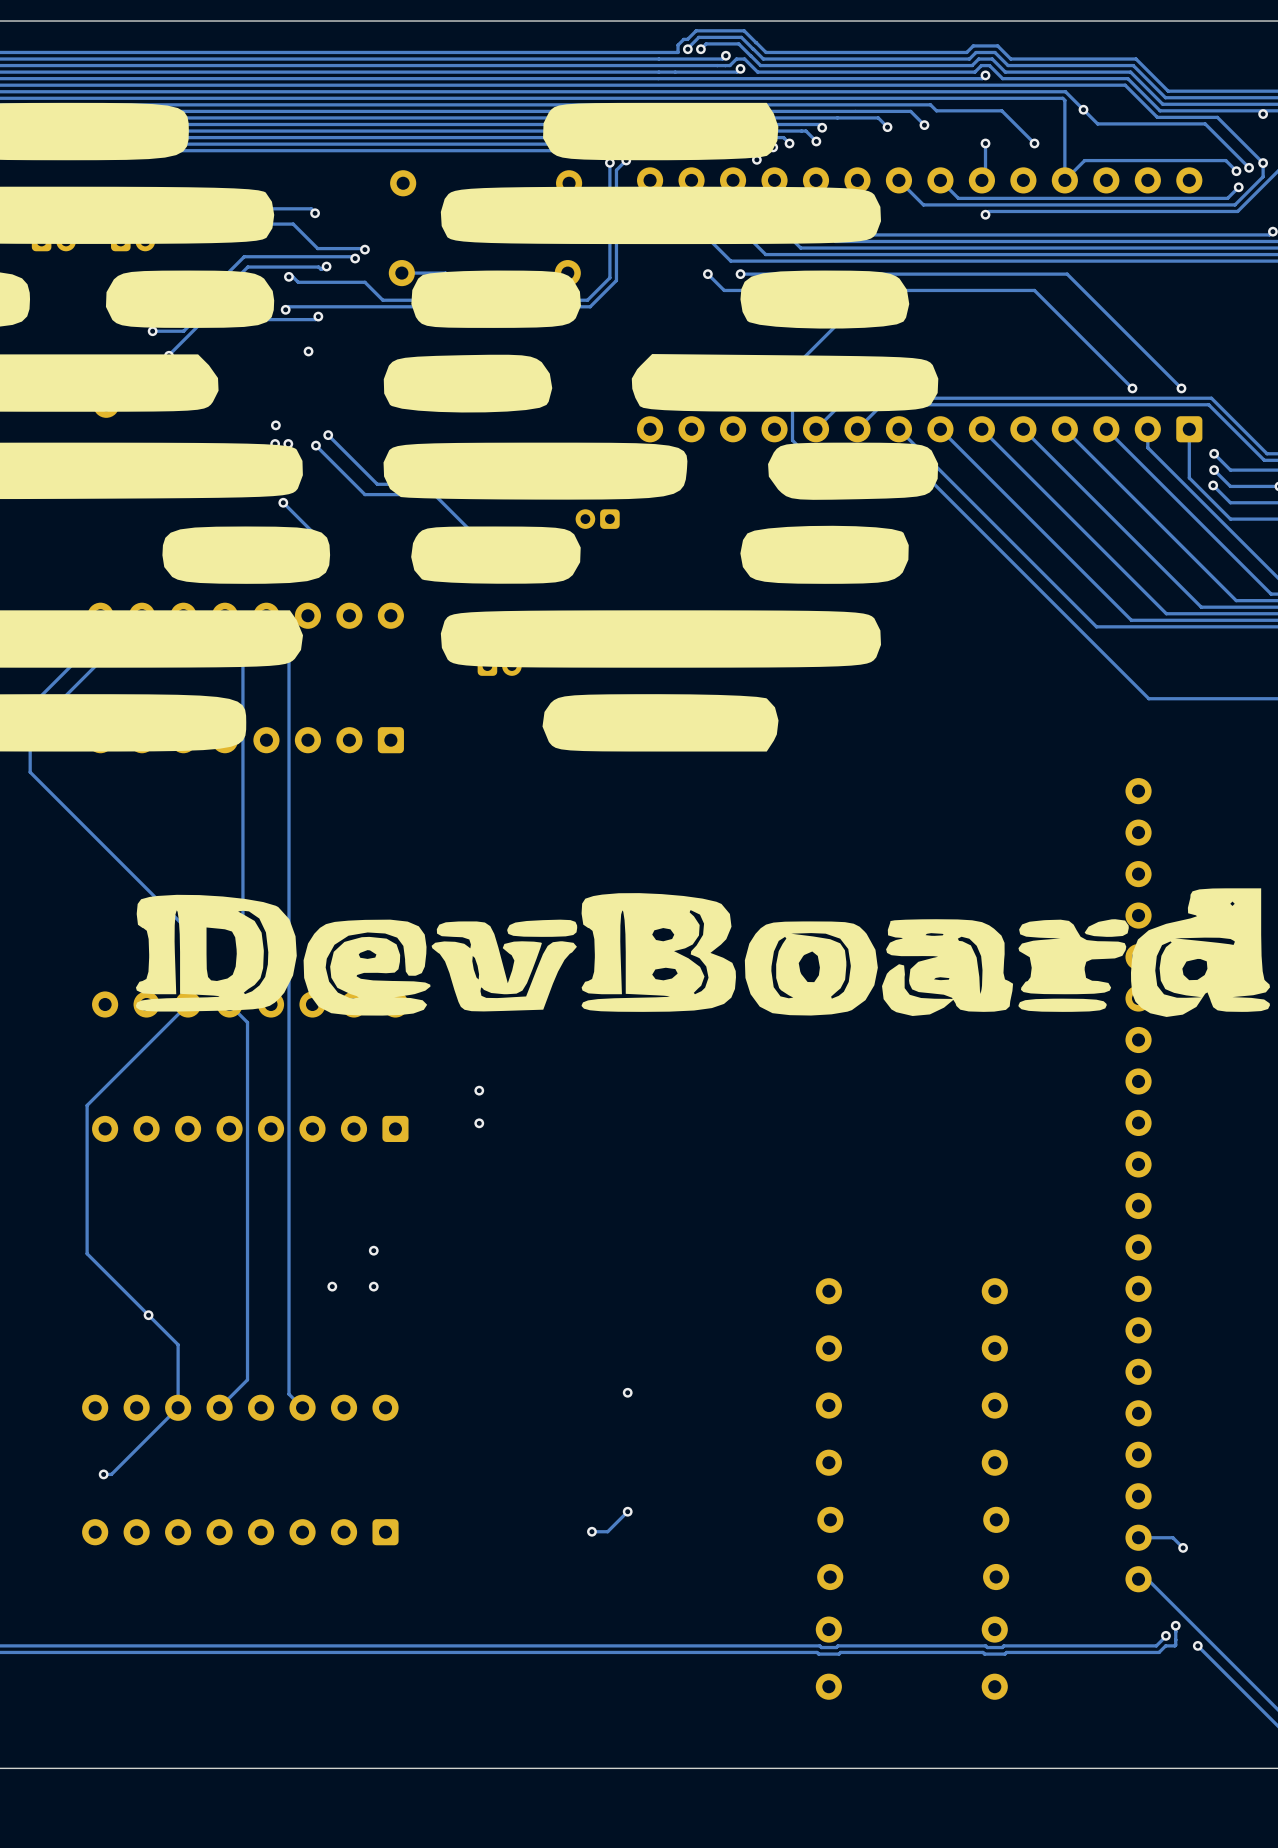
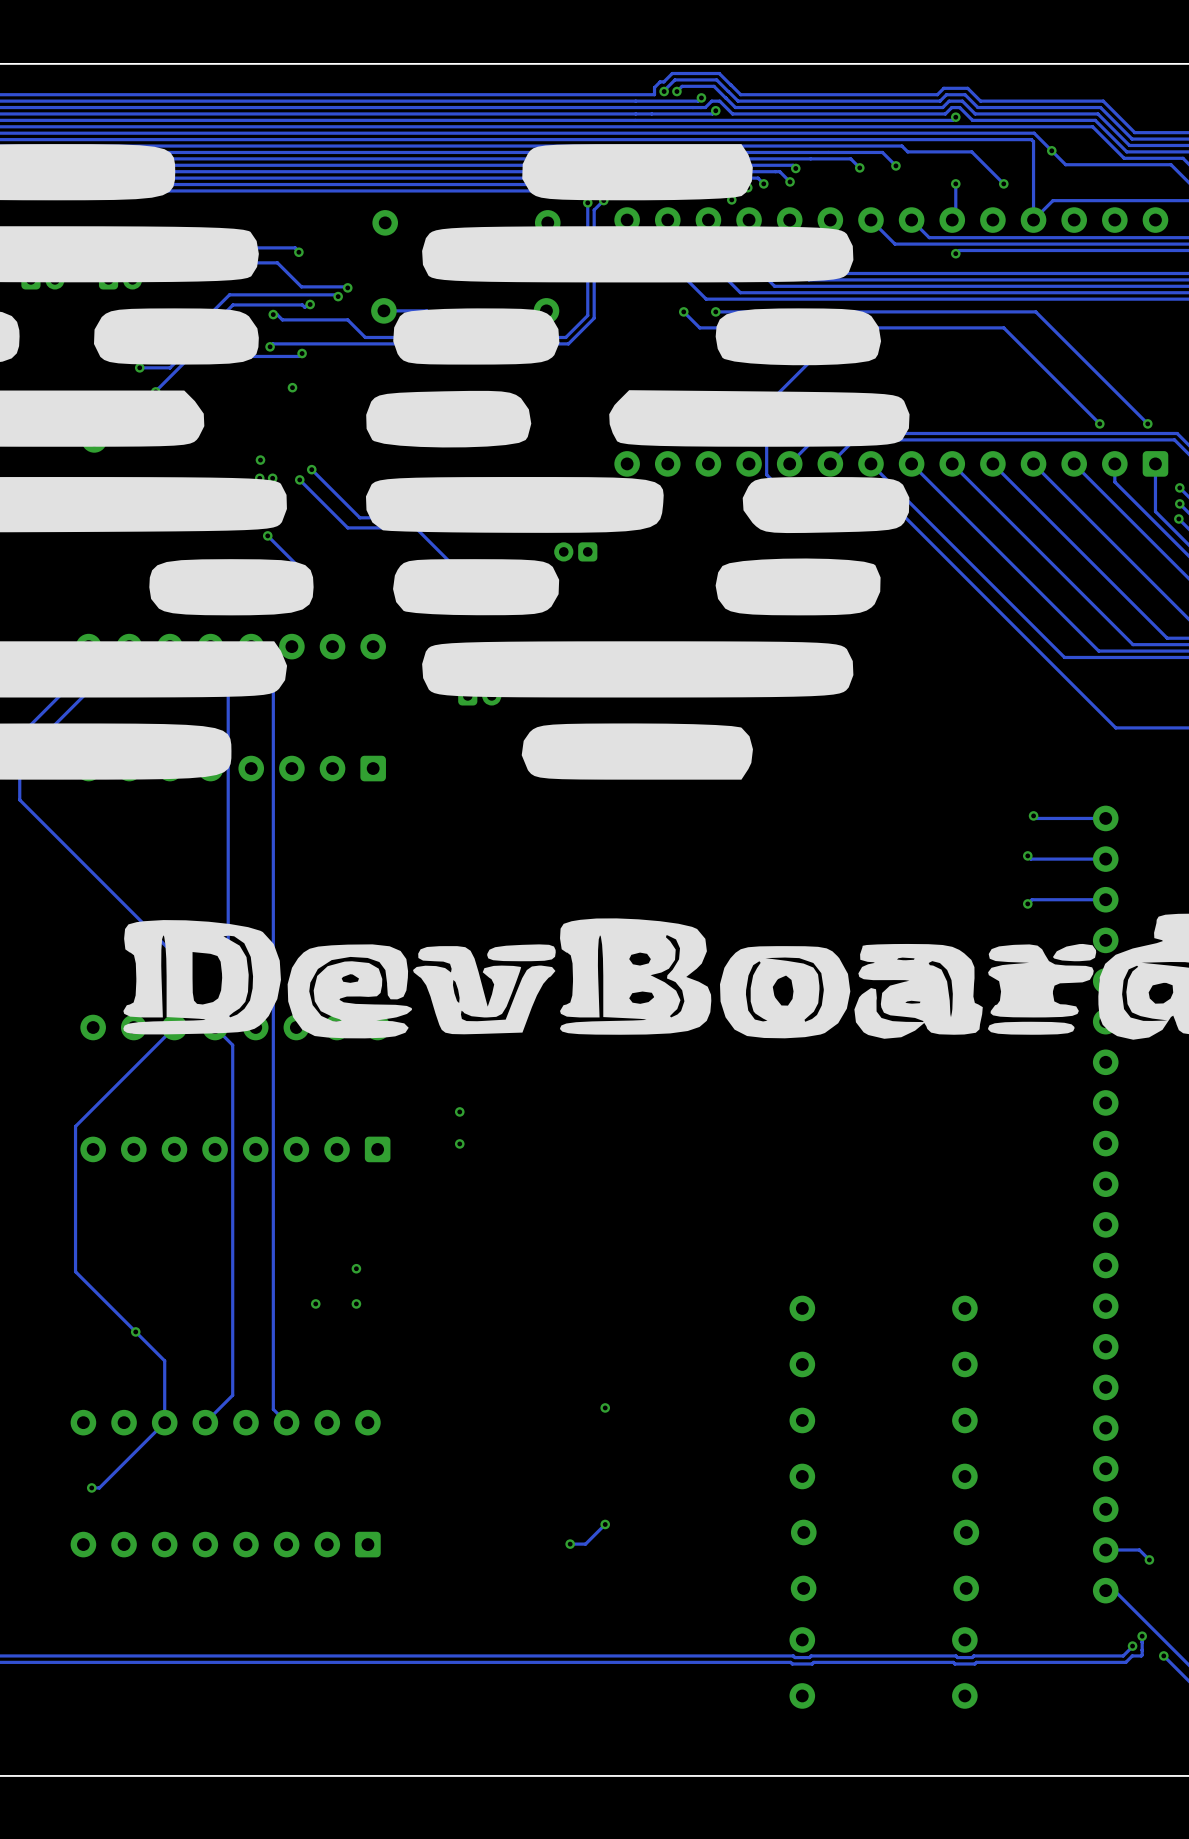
track: none -> (1033, 815) (1036, 818) (1105, 818)
via: none -> (1033, 815)
track: none -> (1027, 855) (1030, 859) (1105, 859)
via: none -> (1027, 855)
track: none -> (1105, 899) (1031, 899) (1027, 903)
via: none -> (1027, 903)

